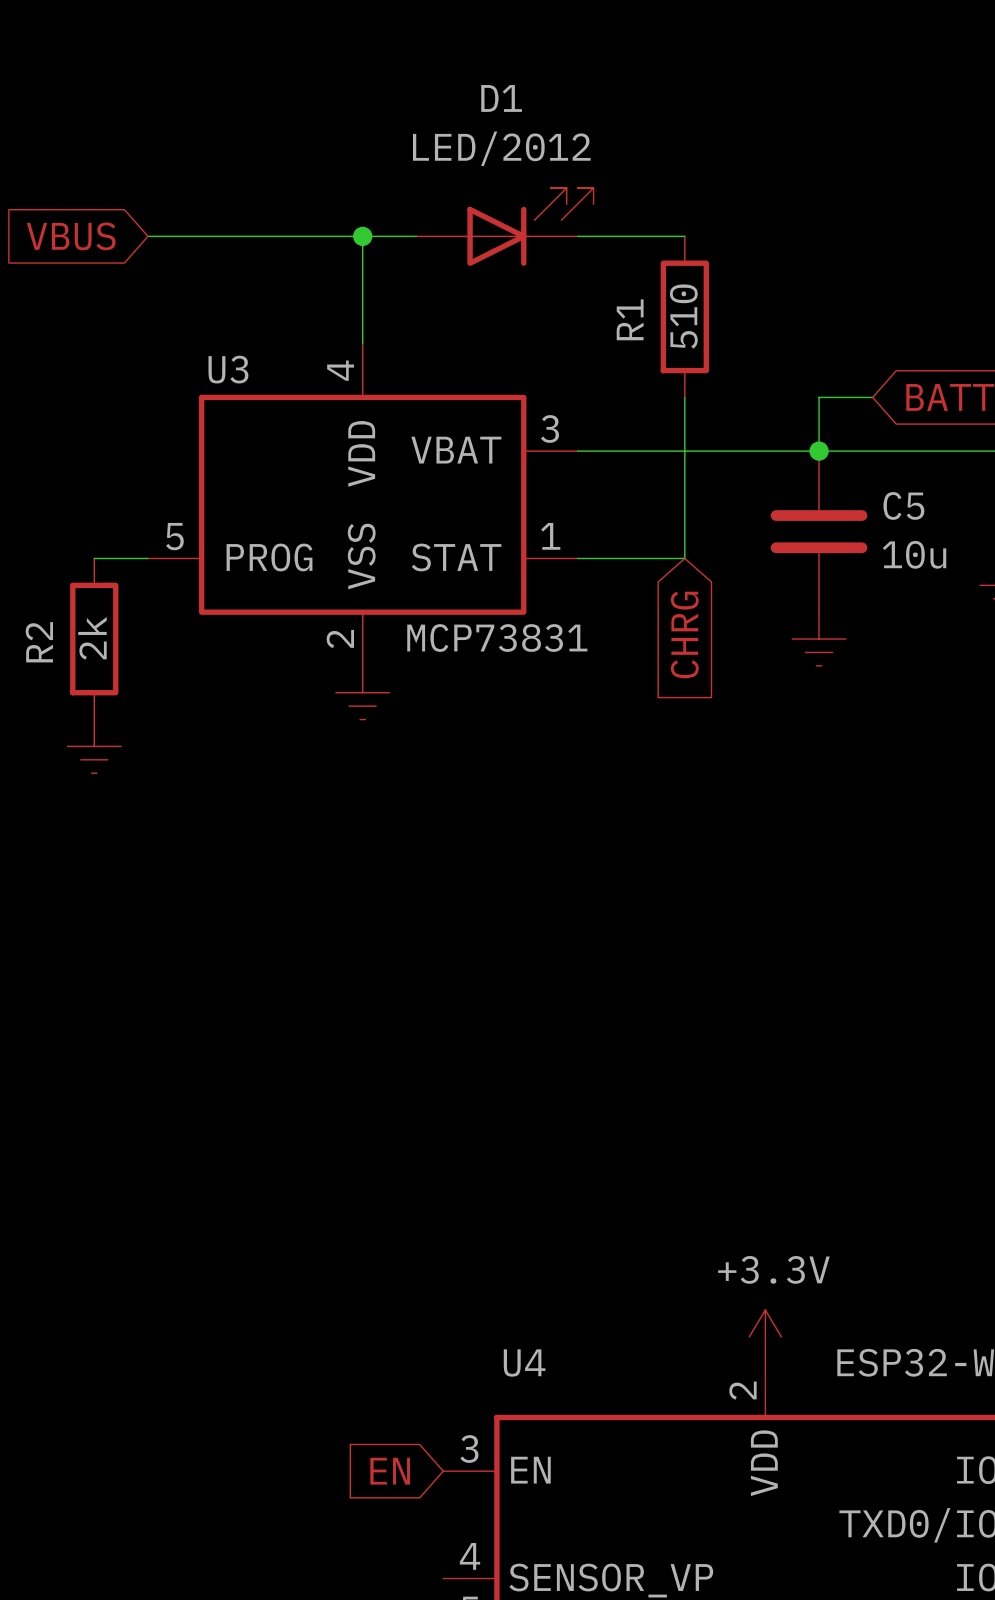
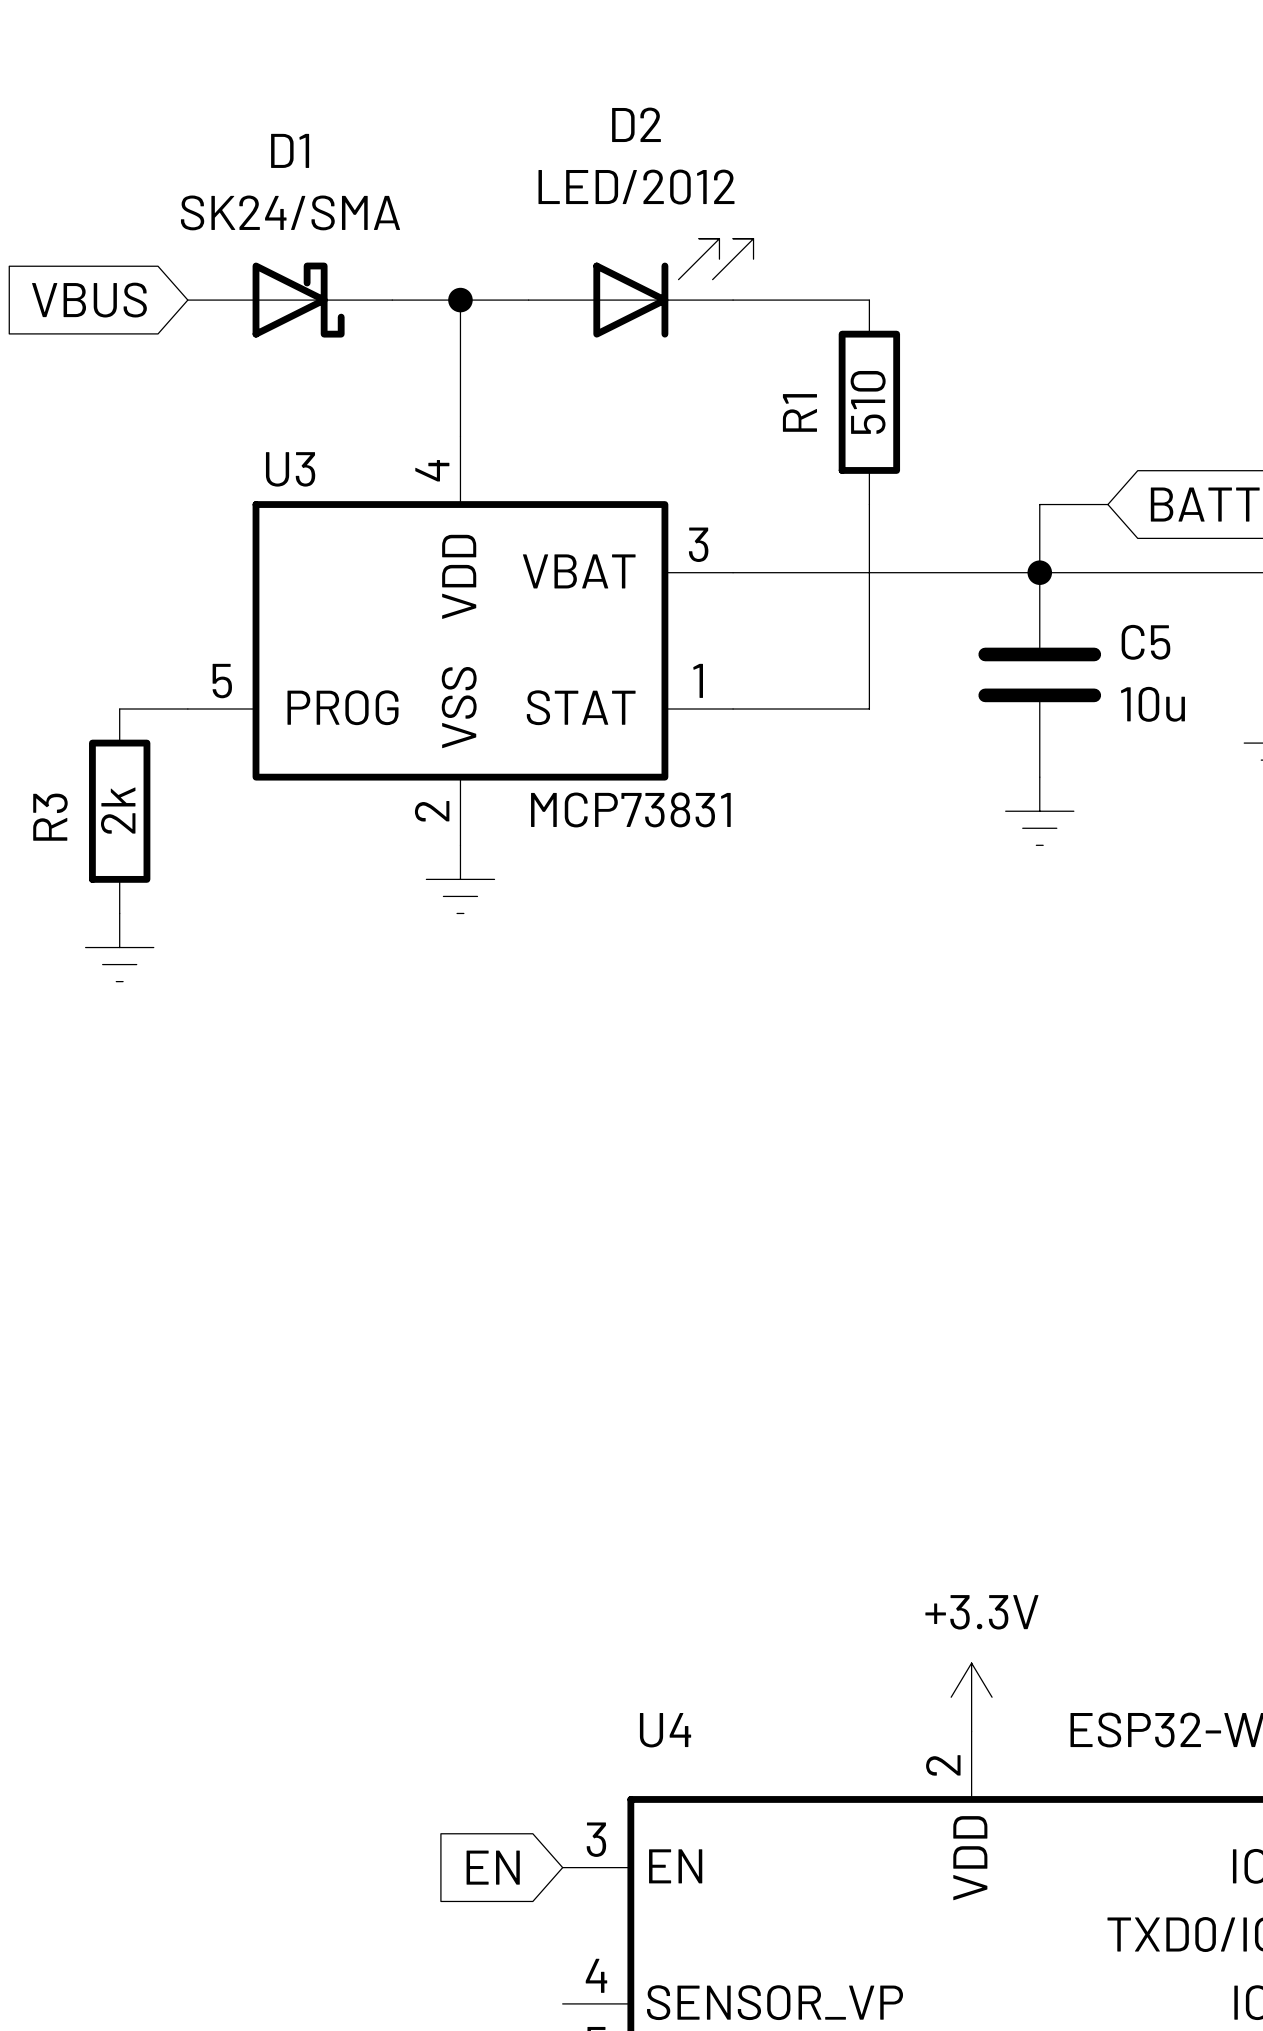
D1 name: D1 (501, 98) -> D2 (636, 124)
D1: none -> SK24/SMA (290, 300)
global label: CHRG (684, 634) -> none
R2 name: R2 (39, 642) -> R3 (50, 817)

